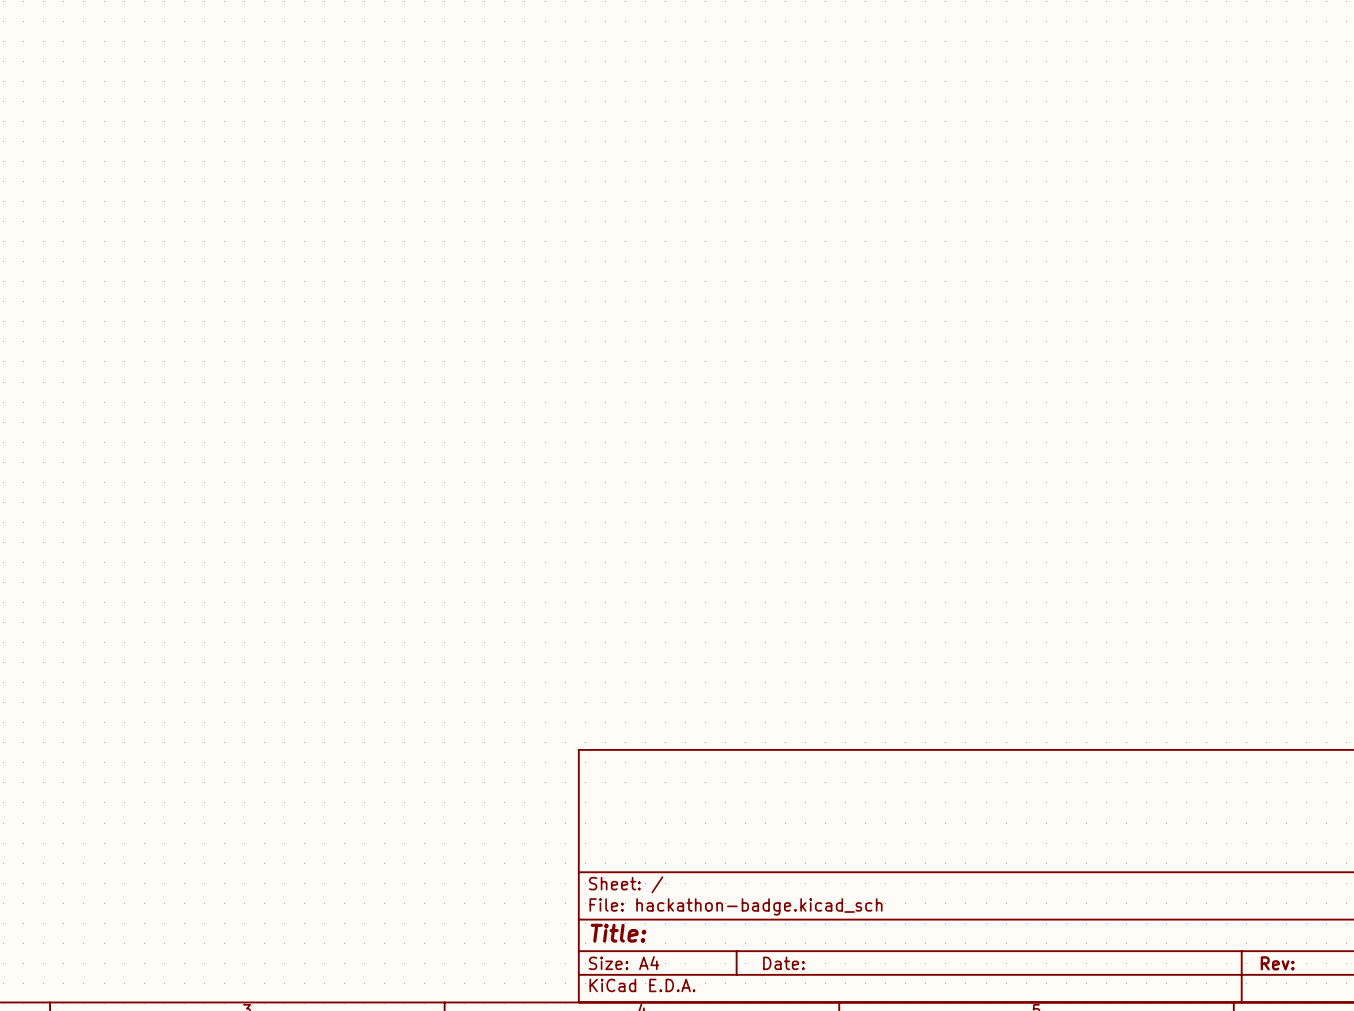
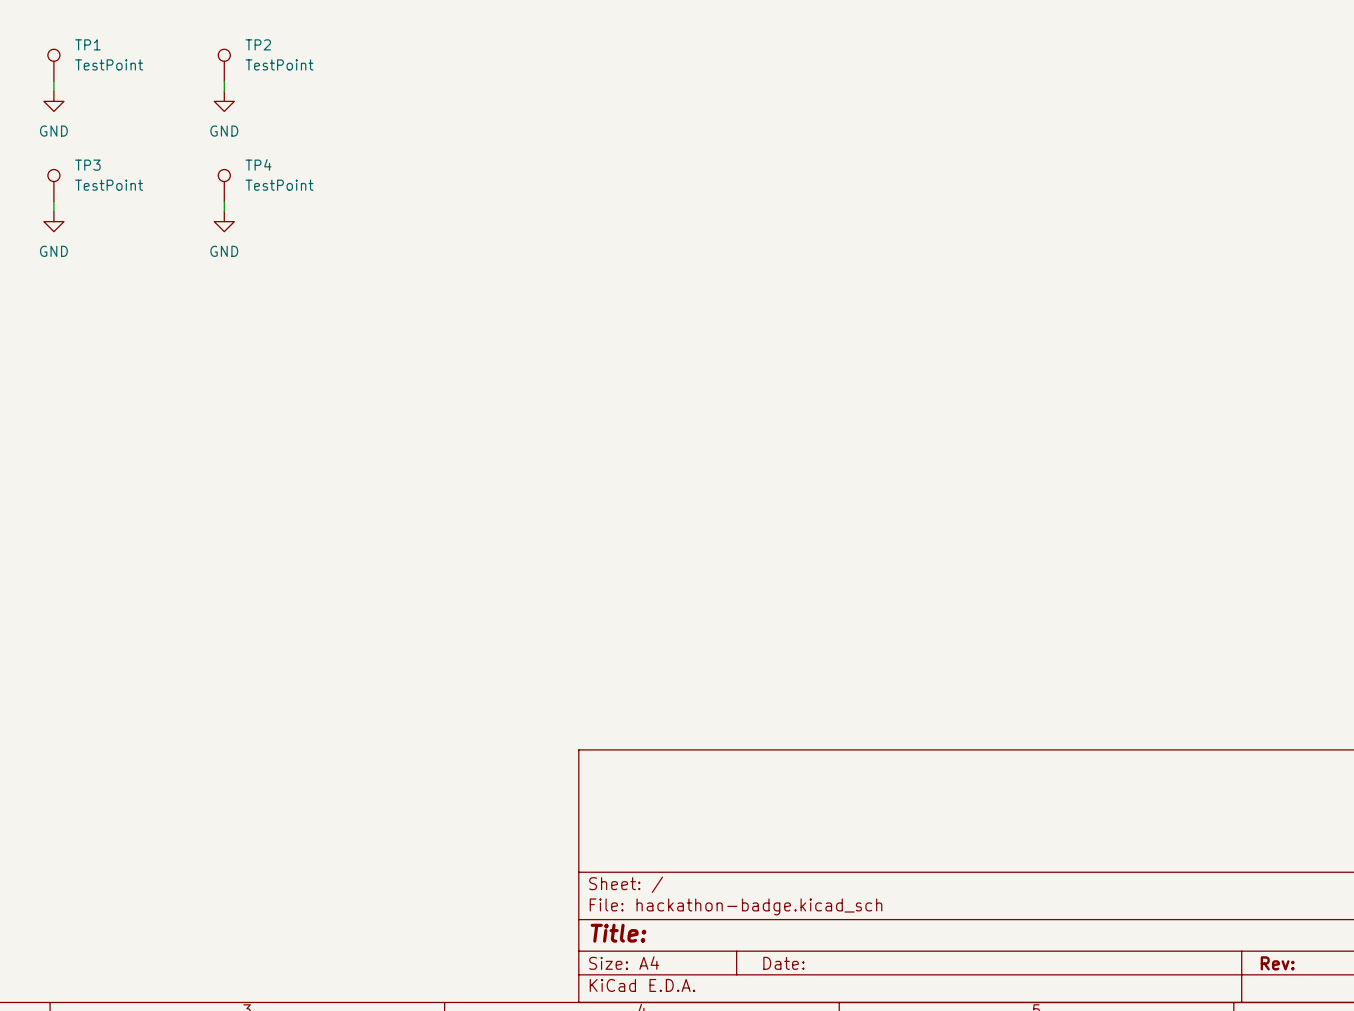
TP1: none -> TestPoint (53, 65)
TP2: none -> TestPoint (224, 65)
wire: none -> (53, 81) (53, 91)
wire: none -> (224, 81) (224, 91)
power symbol: none -> GND (53, 101)
power symbol: none -> GND (224, 101)
TP3: none -> TestPoint (53, 185)
TP4: none -> TestPoint (224, 185)
wire: none -> (53, 201) (53, 211)
wire: none -> (224, 201) (224, 211)
power symbol: none -> GND (53, 221)
power symbol: none -> GND (224, 221)

